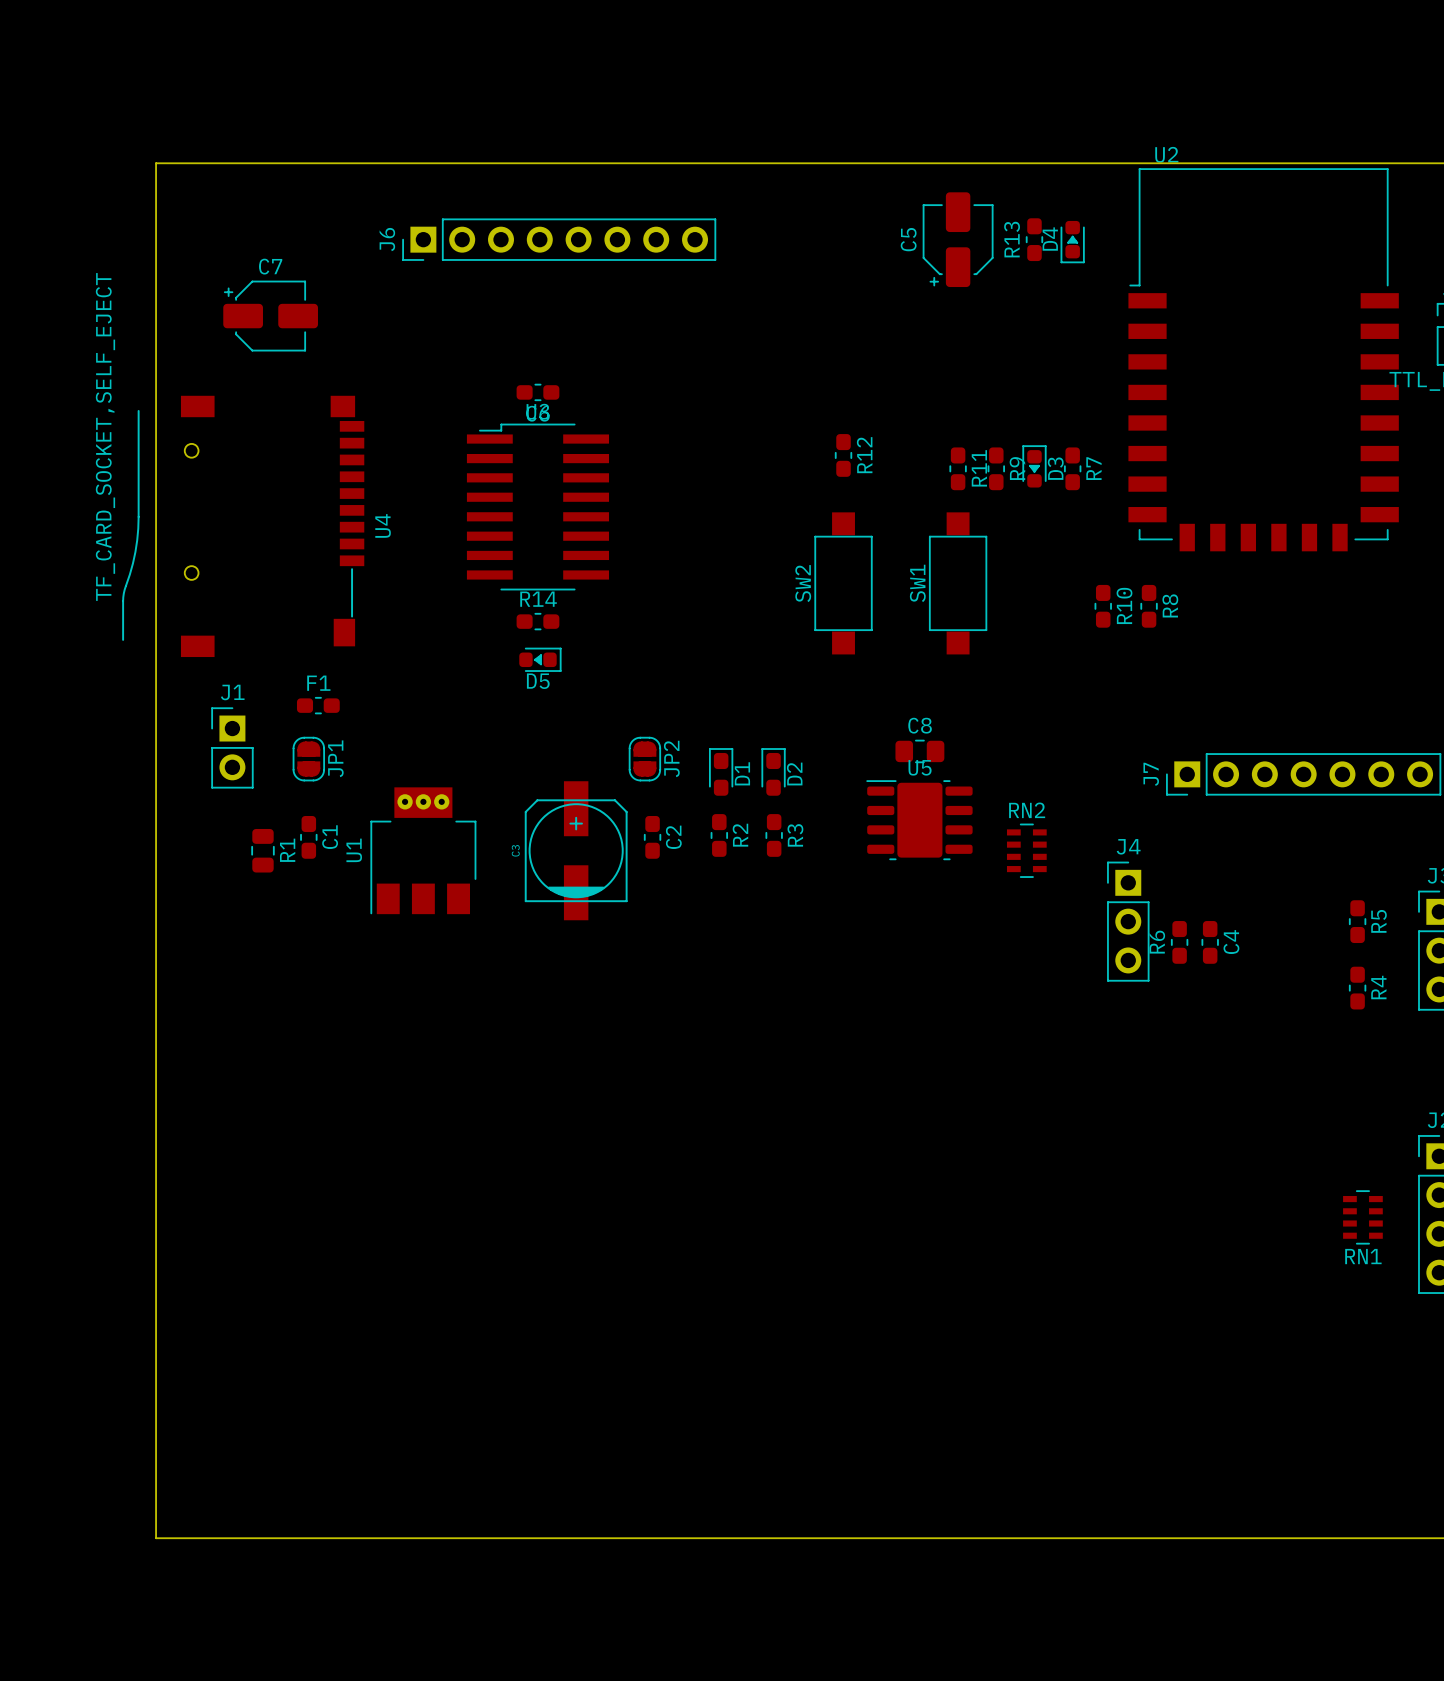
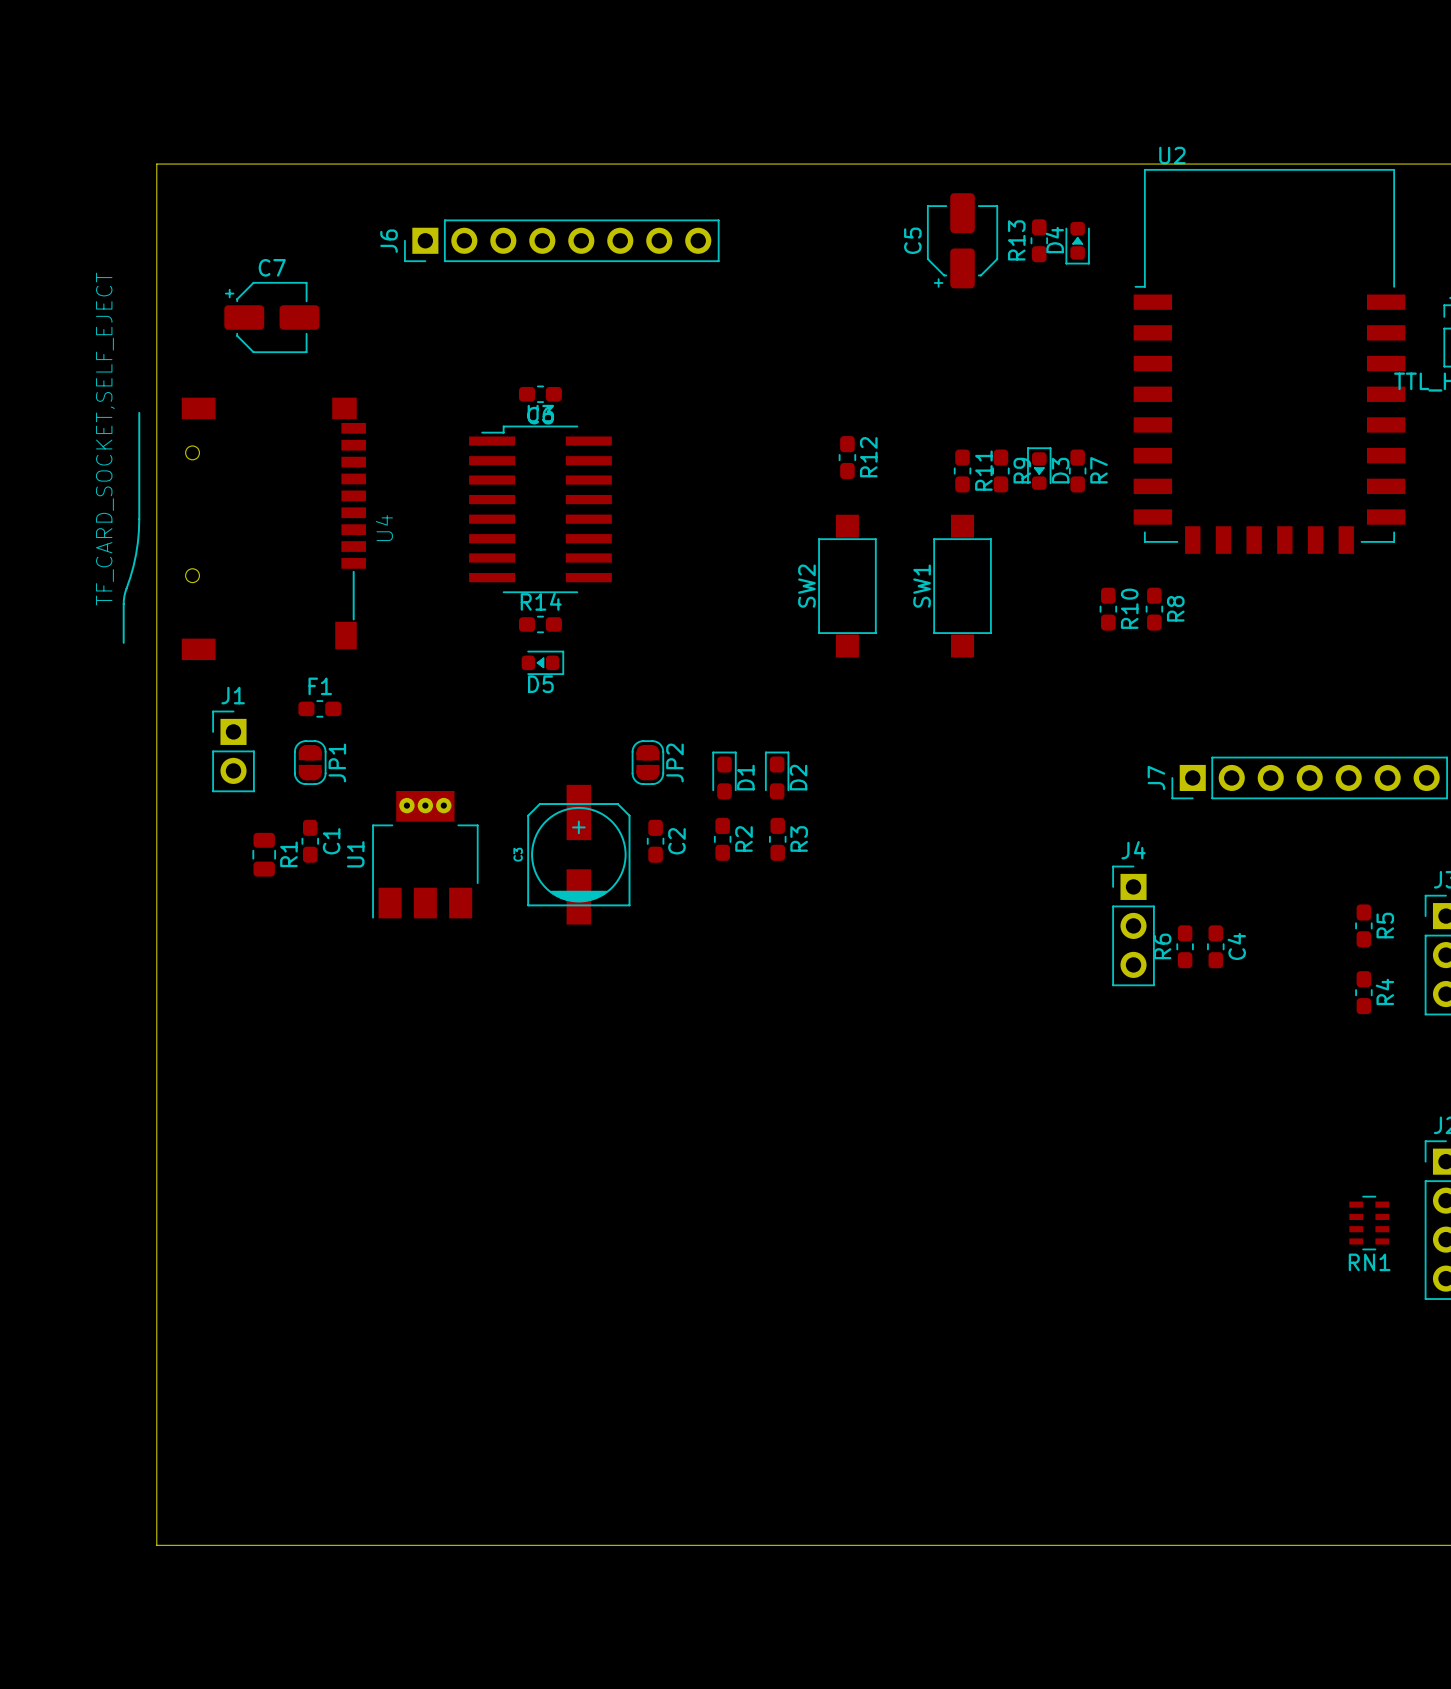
C8: (919, 751) -> none
U5: (919, 820) -> none
RN2: (1026, 850) -> none

